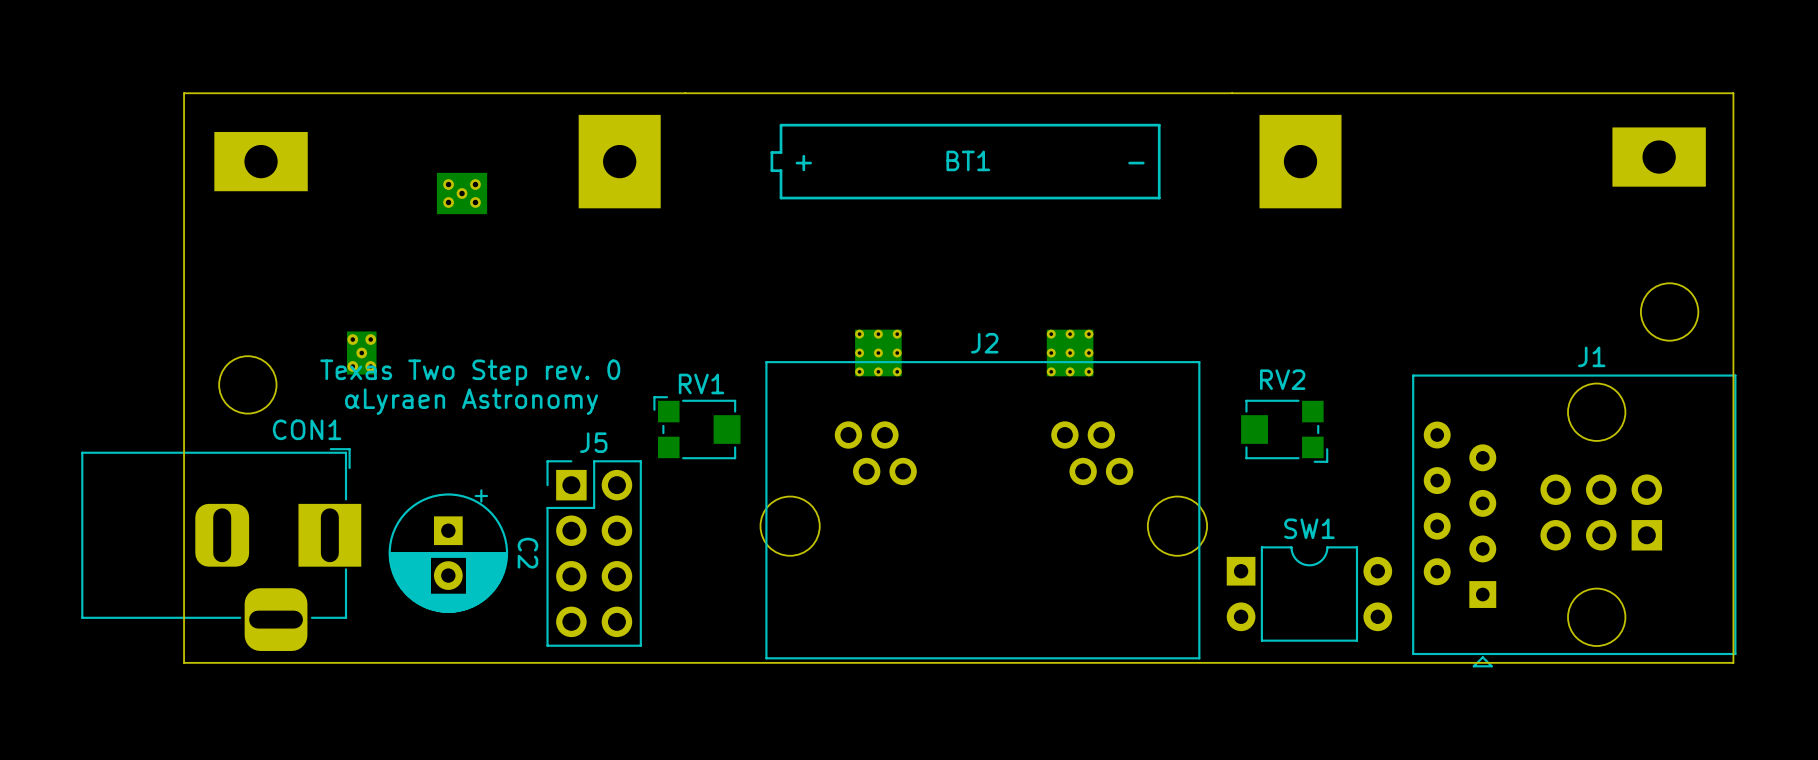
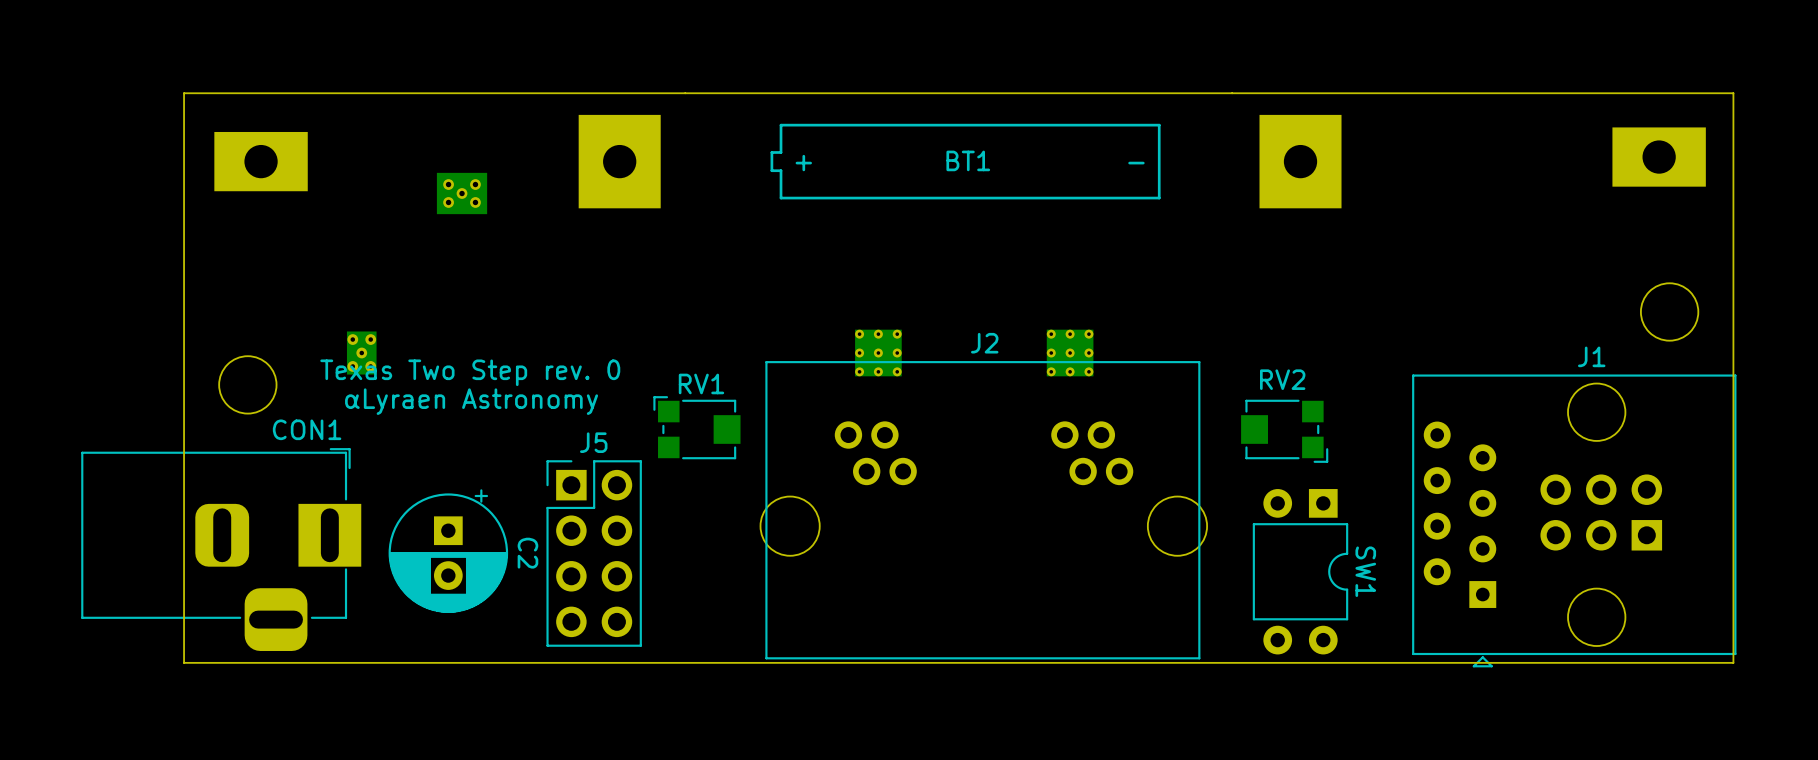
SW1 rotation: 0° (1309, 594) -> 90° clockwise (1300, 571)

